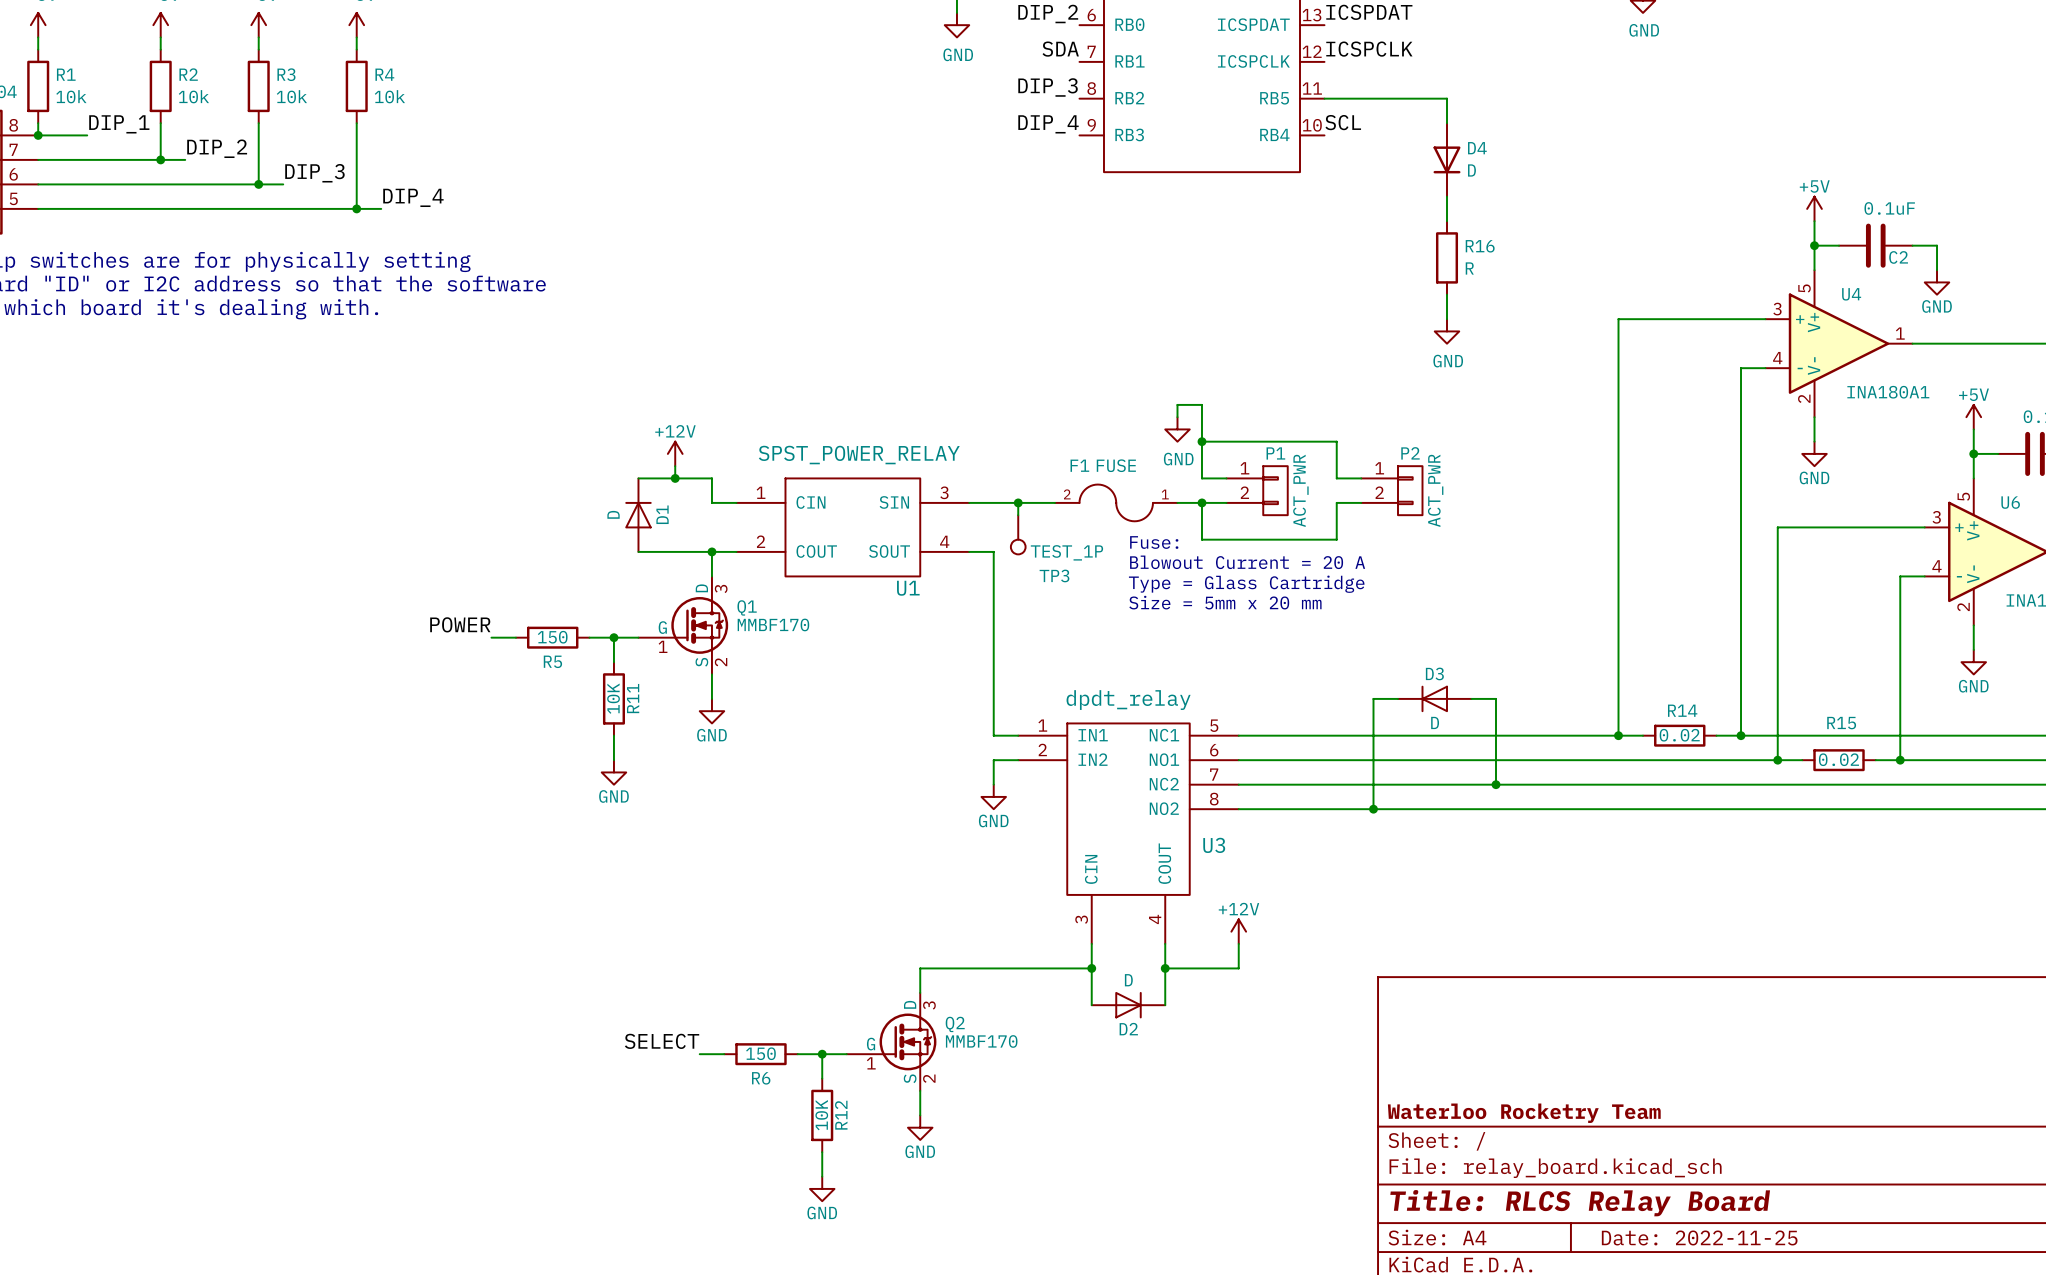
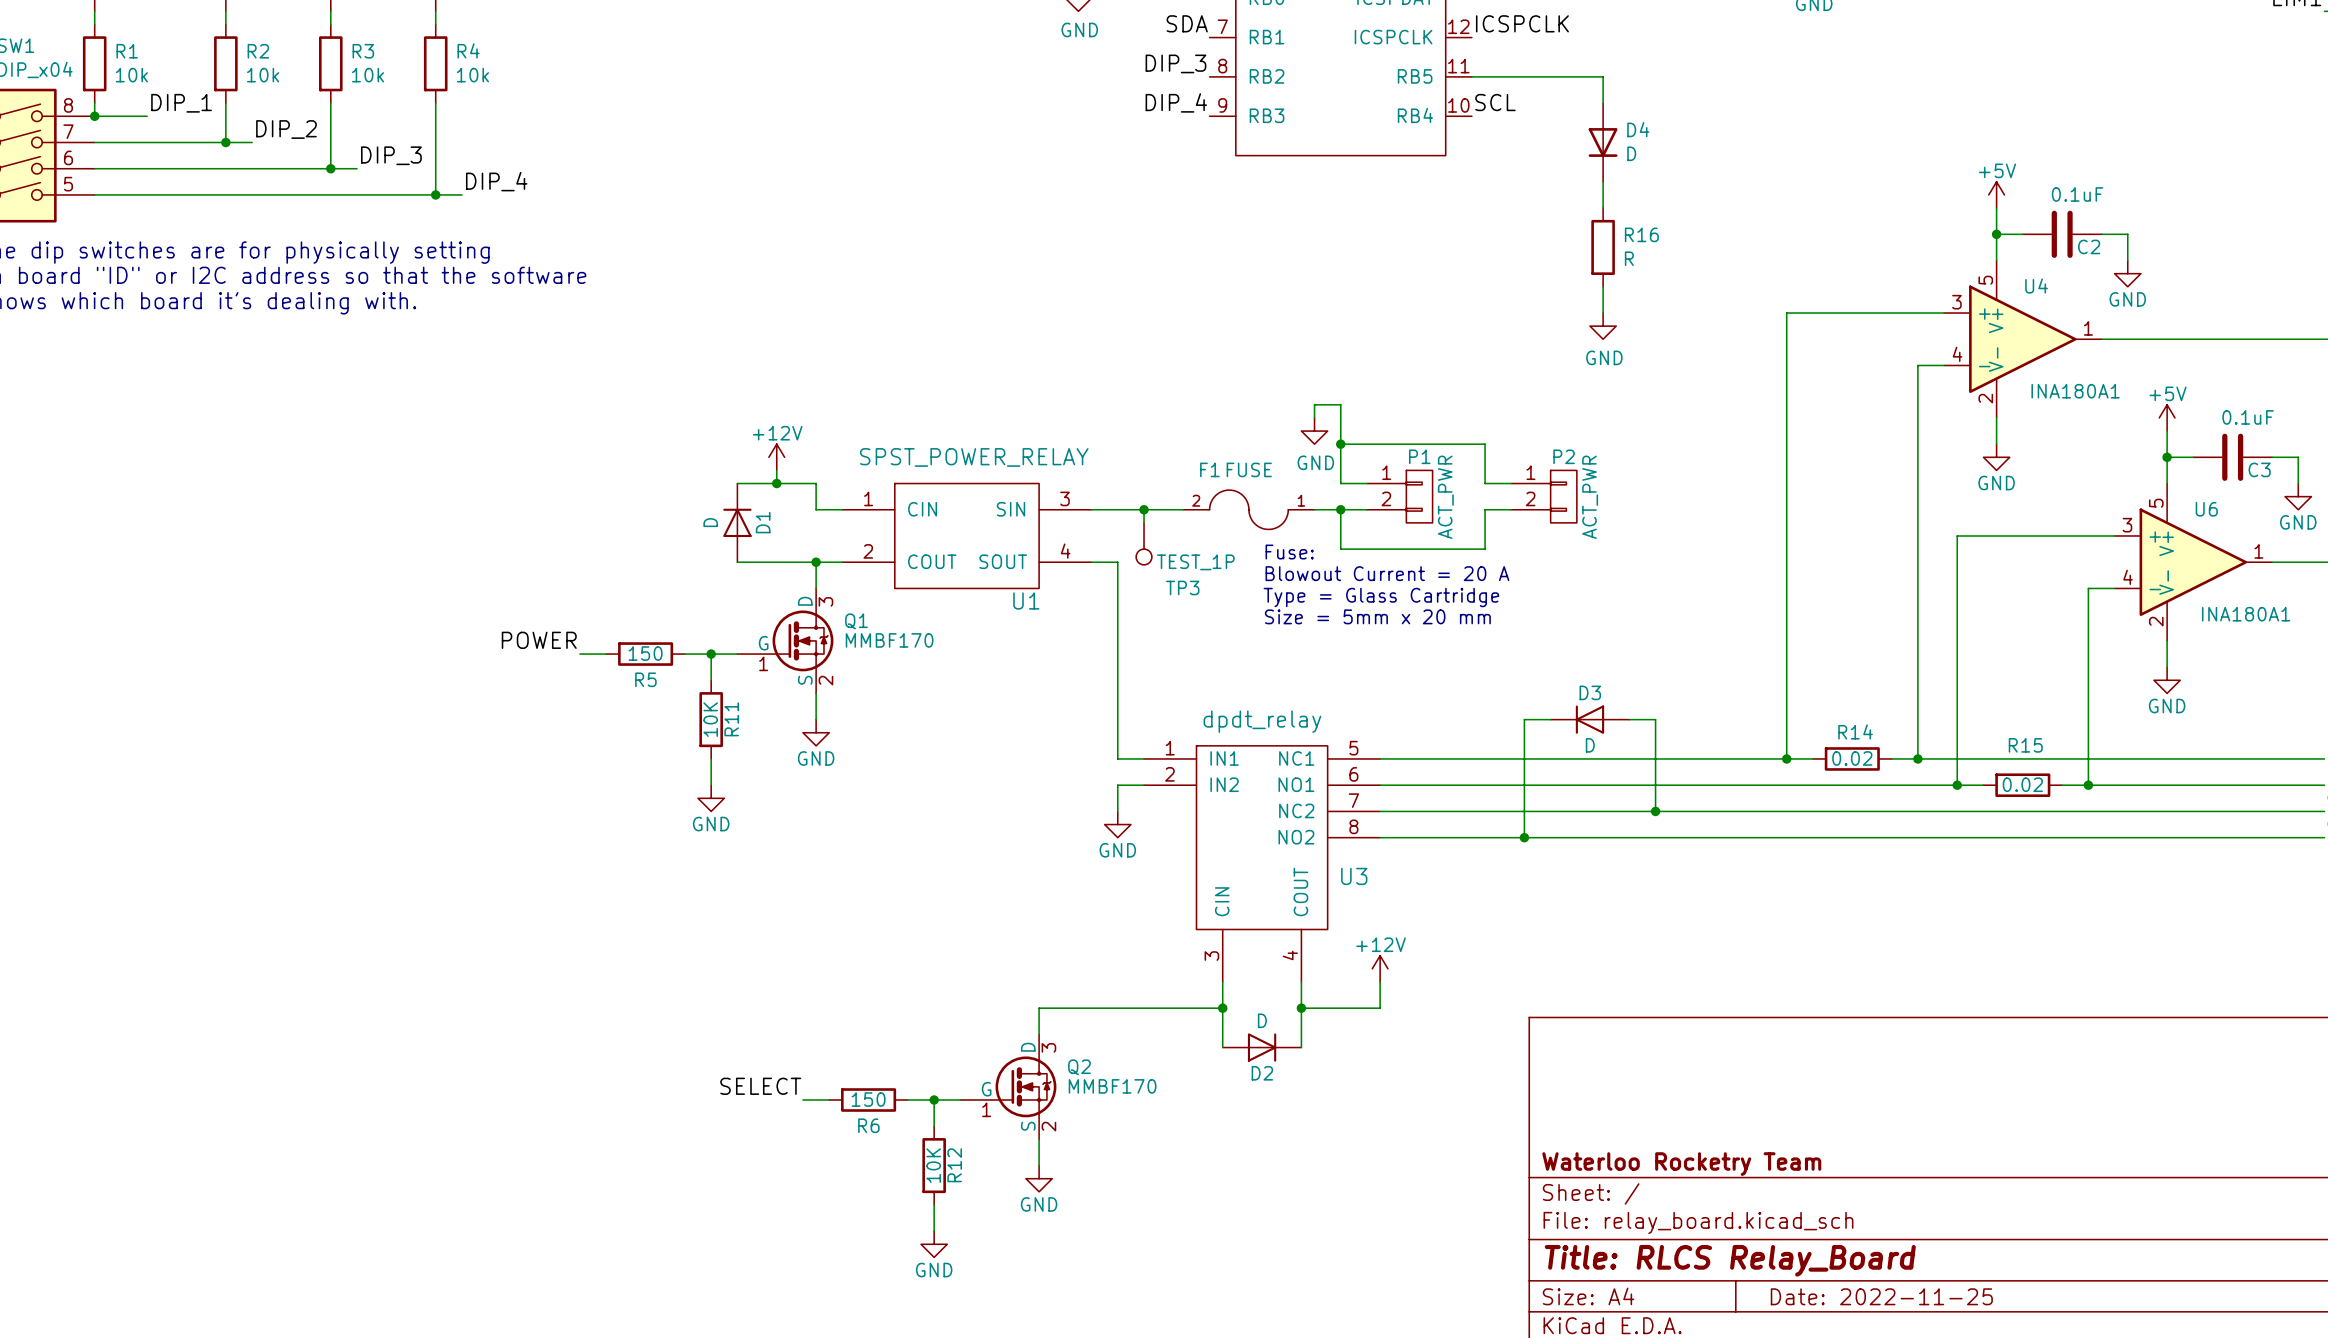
title block: Title: RLCS Relay Board (1580, 1203) -> Title: RLCS Relay_Board (1730, 1260)

